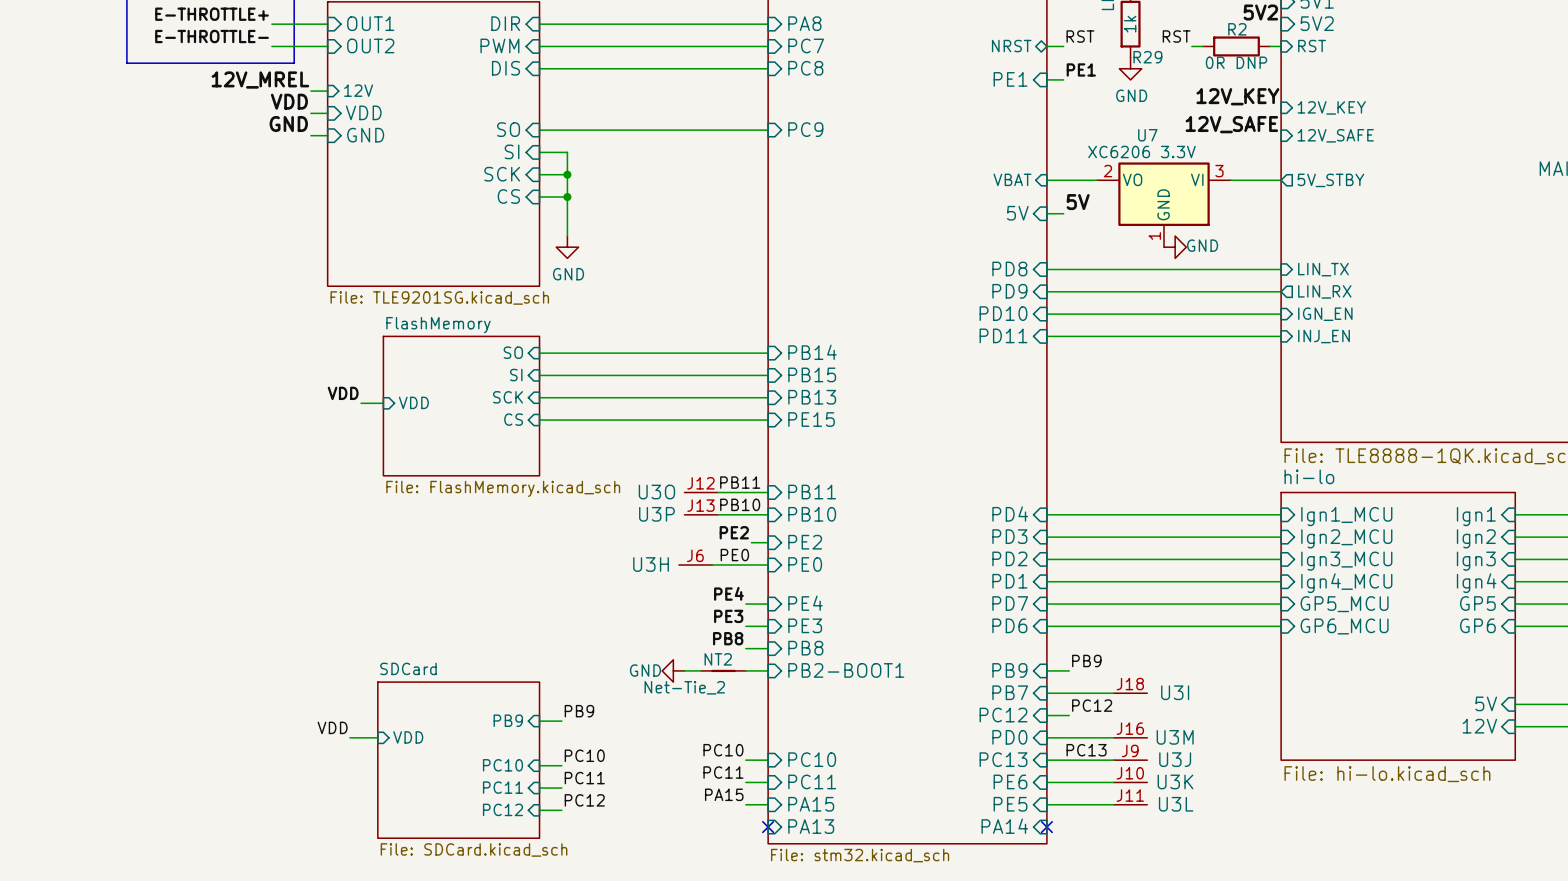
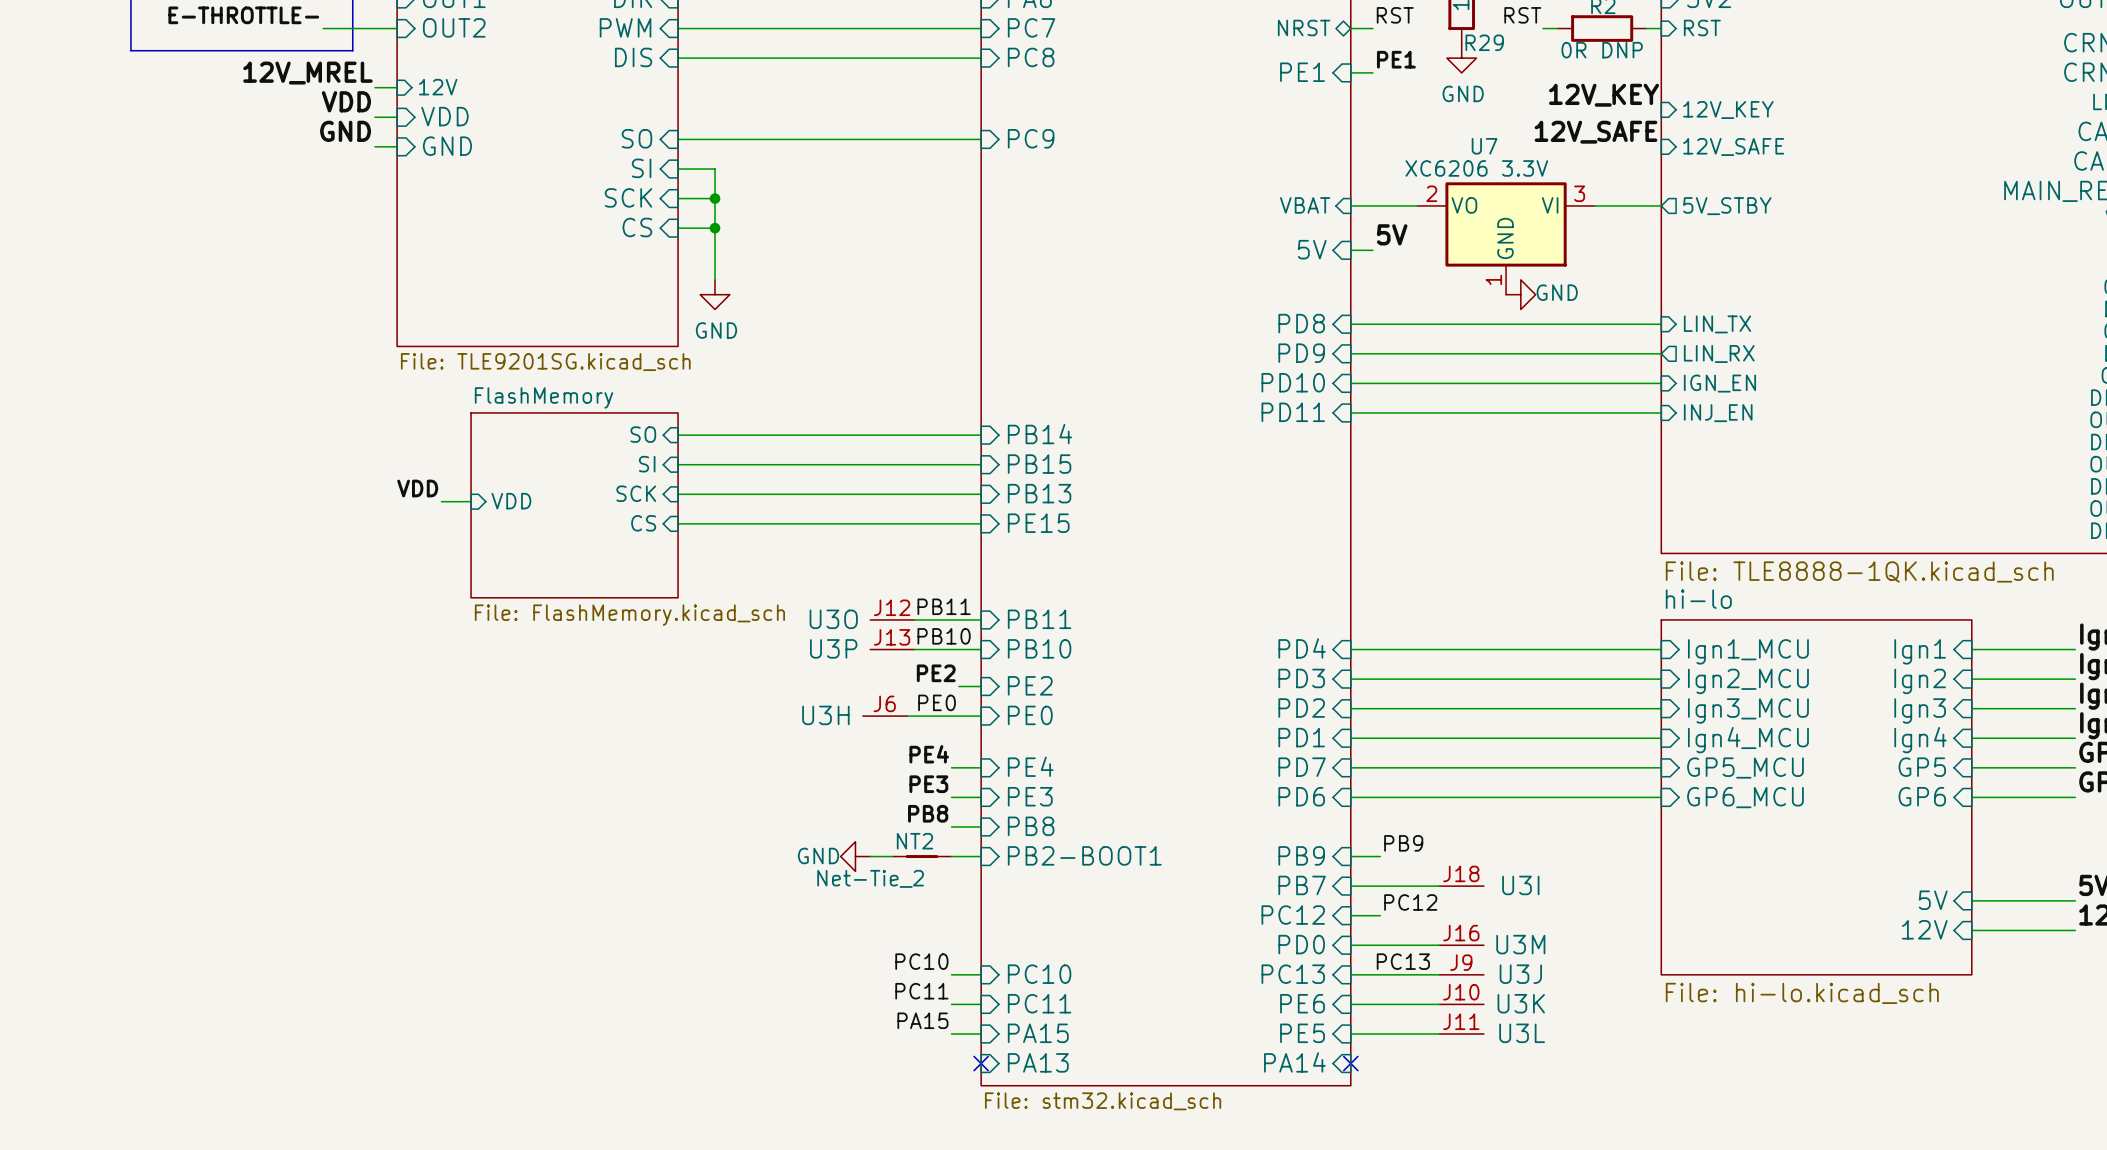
label: PB9 (579, 711) -> none
sheet pin: PB9 (508, 720) -> none
wire: (539, 721) (561, 721) -> none
label: VDD (332, 727) -> none
wire: (349, 737) (377, 737) -> none
sheet pin: VDD (408, 737) -> none
label: PC10 (584, 755) -> none
sheet SDCard: File: SDCard.kicad_sch (458, 760) -> none
sheet pin: PC10 (502, 765) -> none
wire: (539, 765) (561, 765) -> none
label: PC11 (584, 778) -> none
sheet pin: PC11 (502, 787) -> none
wire: (539, 788) (561, 788) -> none
label: PC12 (584, 800) -> none
sheet pin: PC12 (502, 809) -> none
wire: (539, 810) (561, 810) -> none

